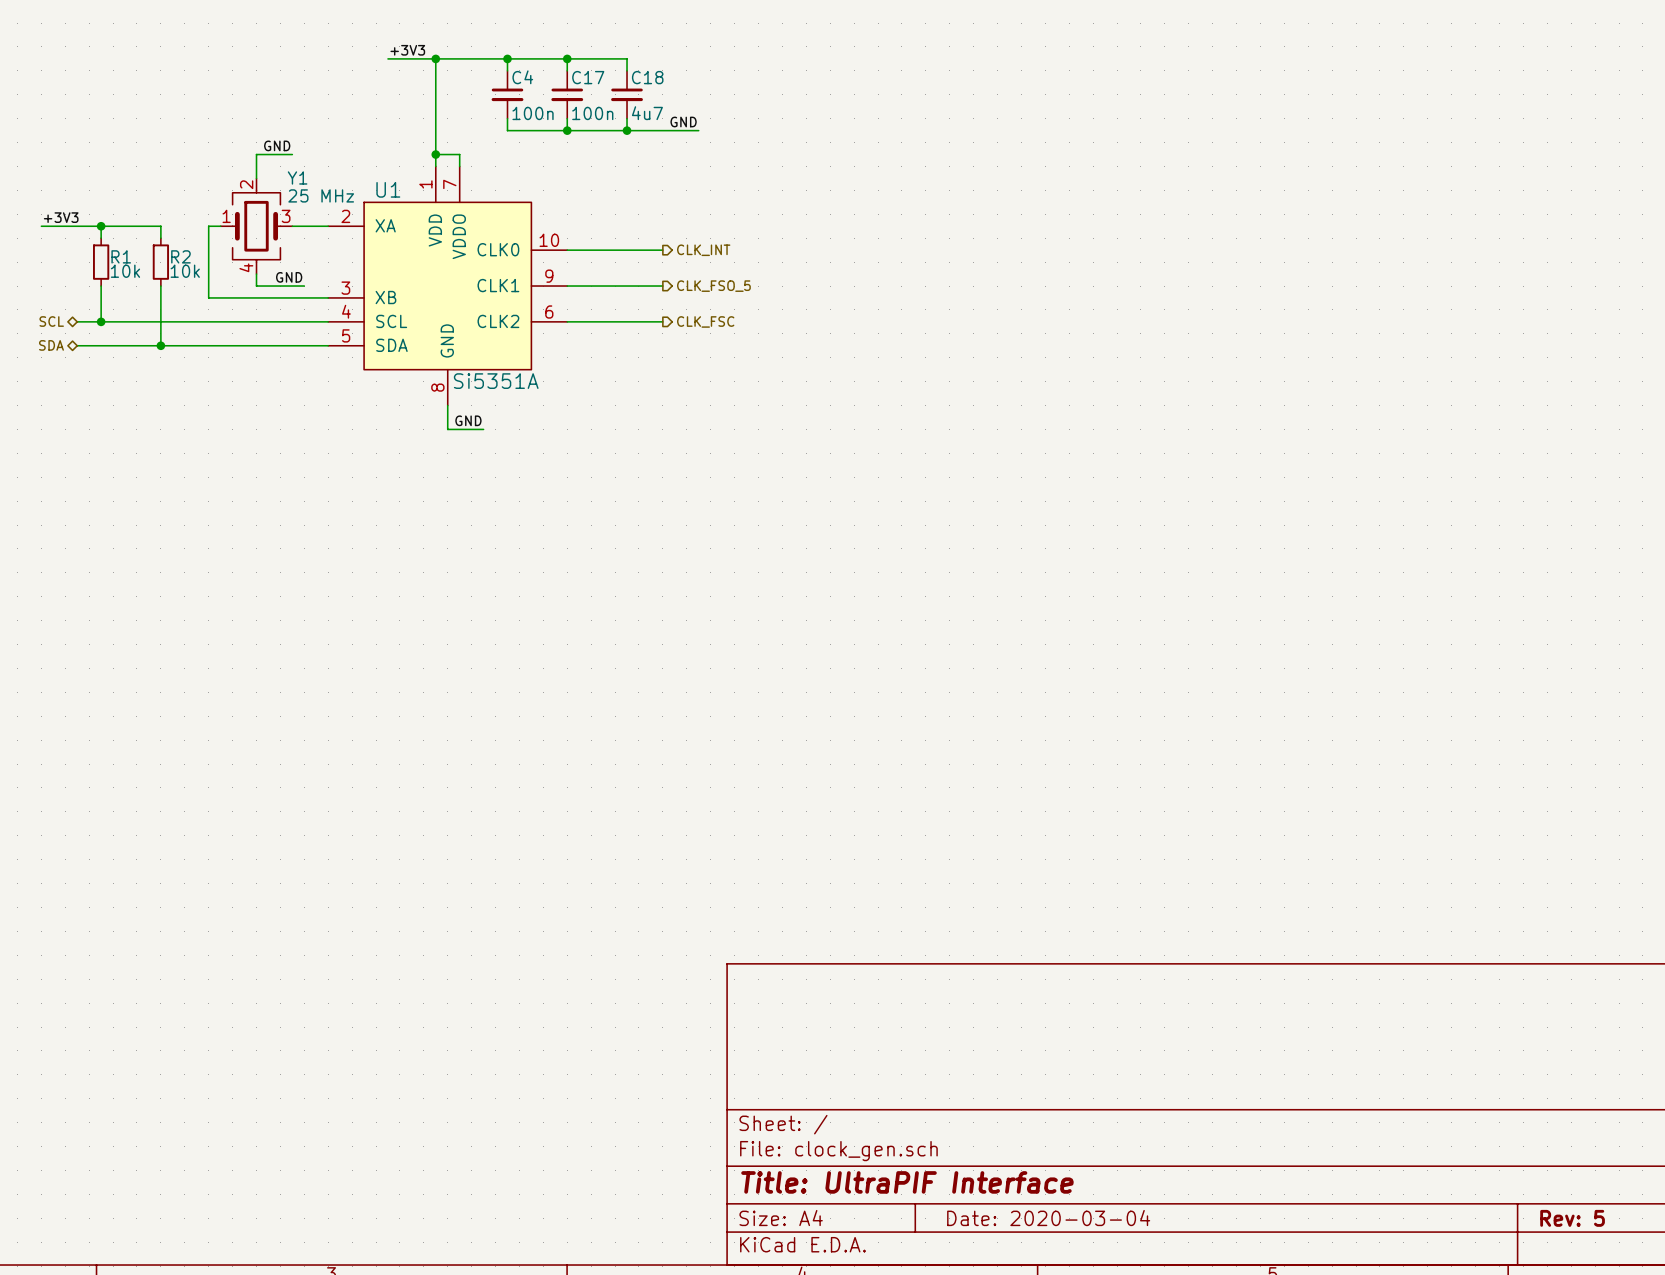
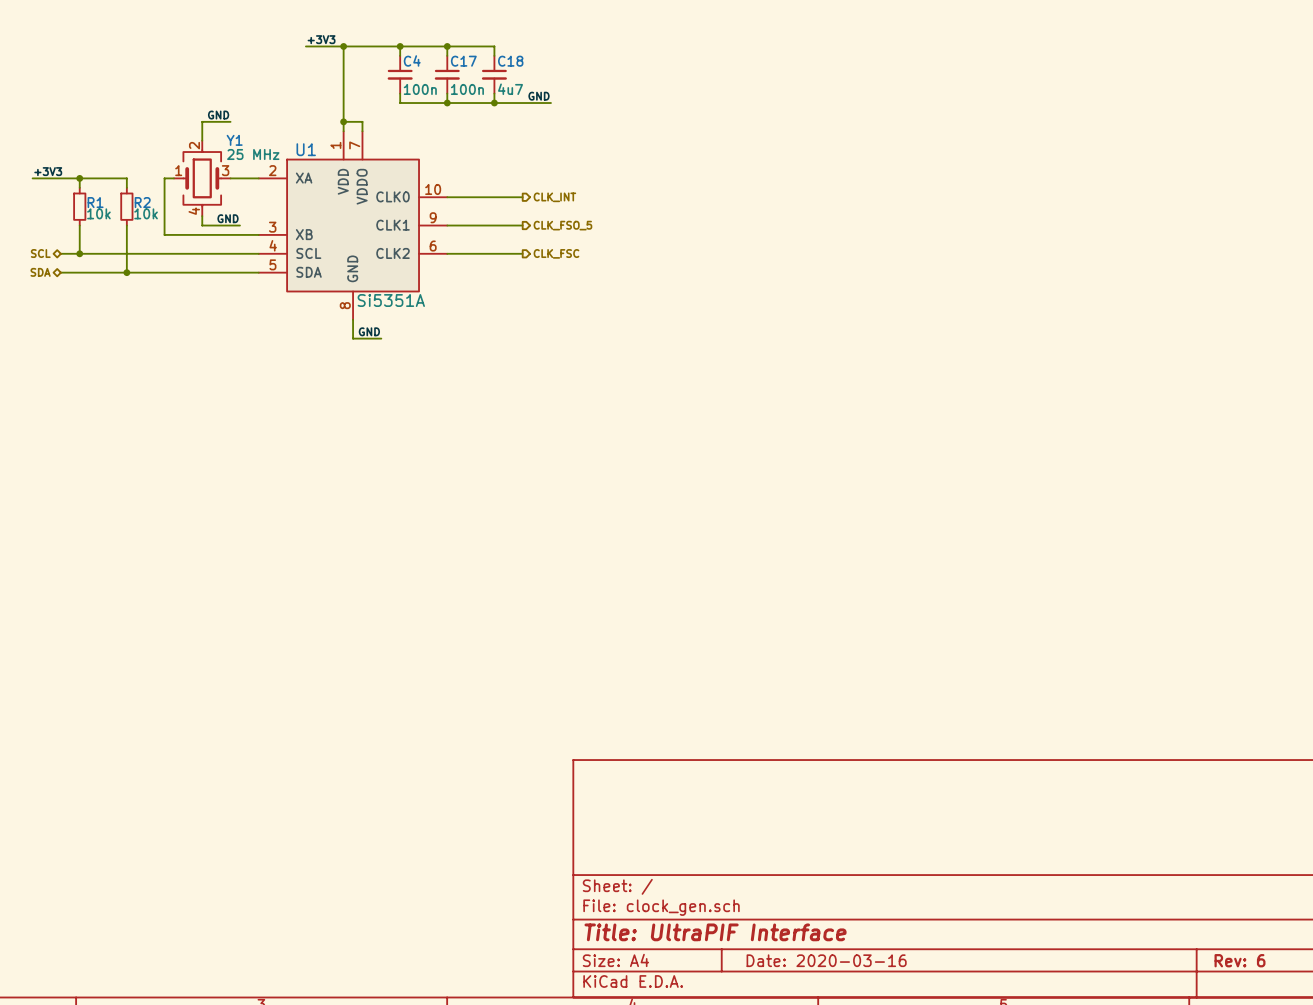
title block: Date: 2020-03-04 (1048, 1218) -> Date: 2020-03-16 (826, 960)
title block: Rev: 5 (1572, 1218) -> Rev: 6 (1240, 960)

